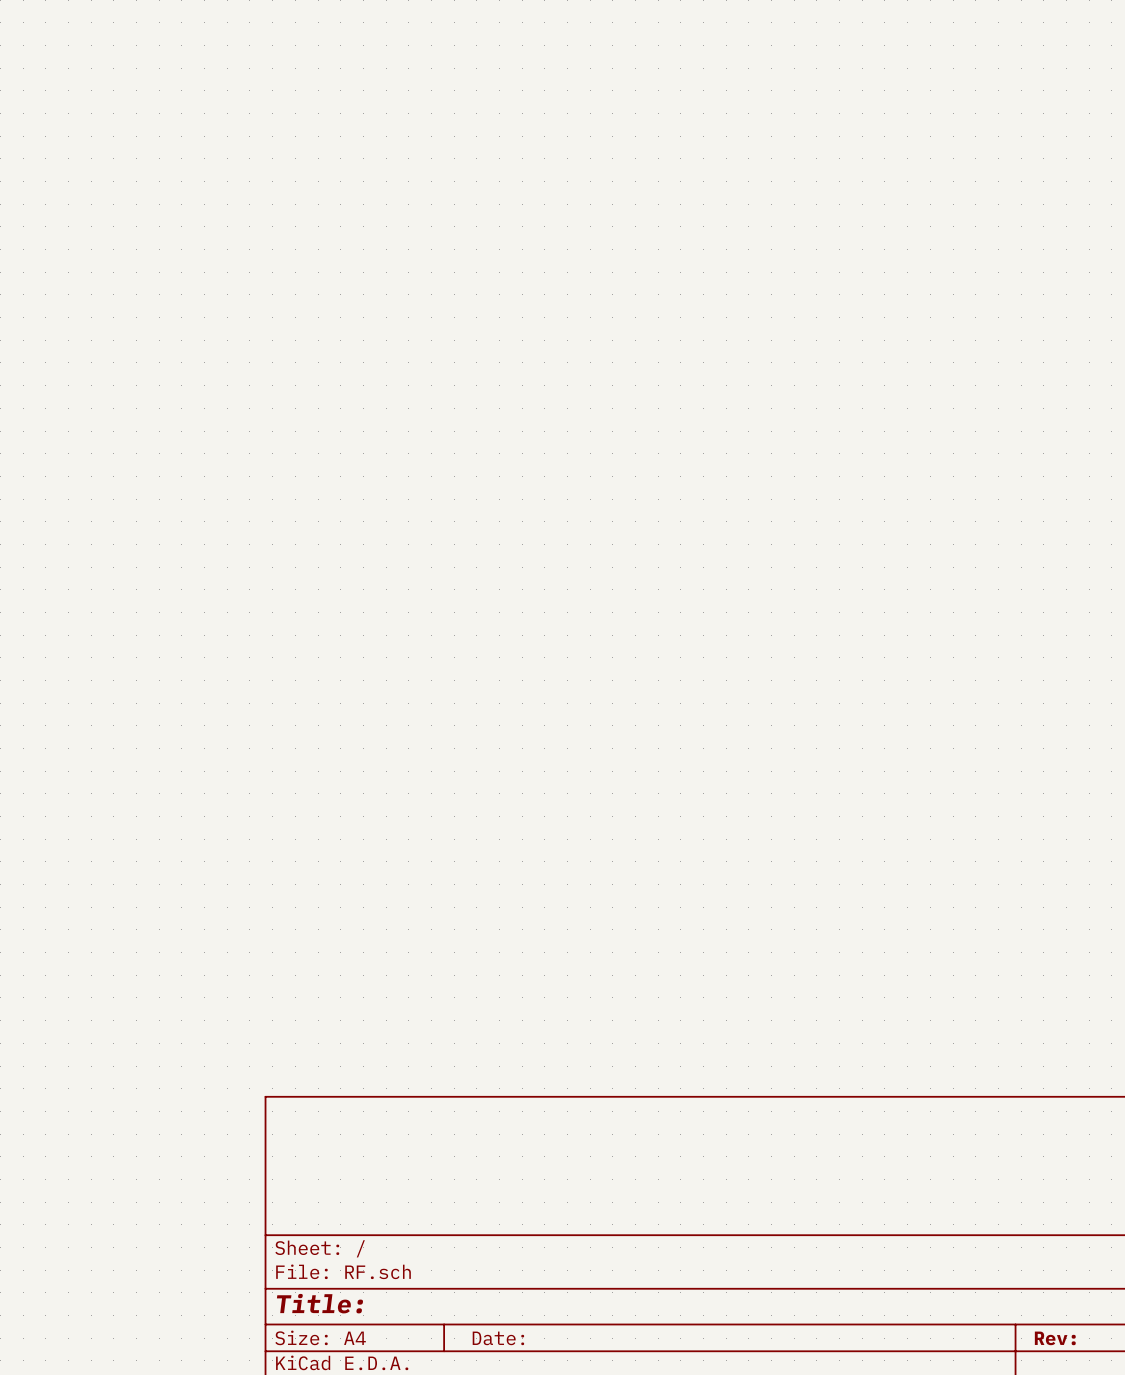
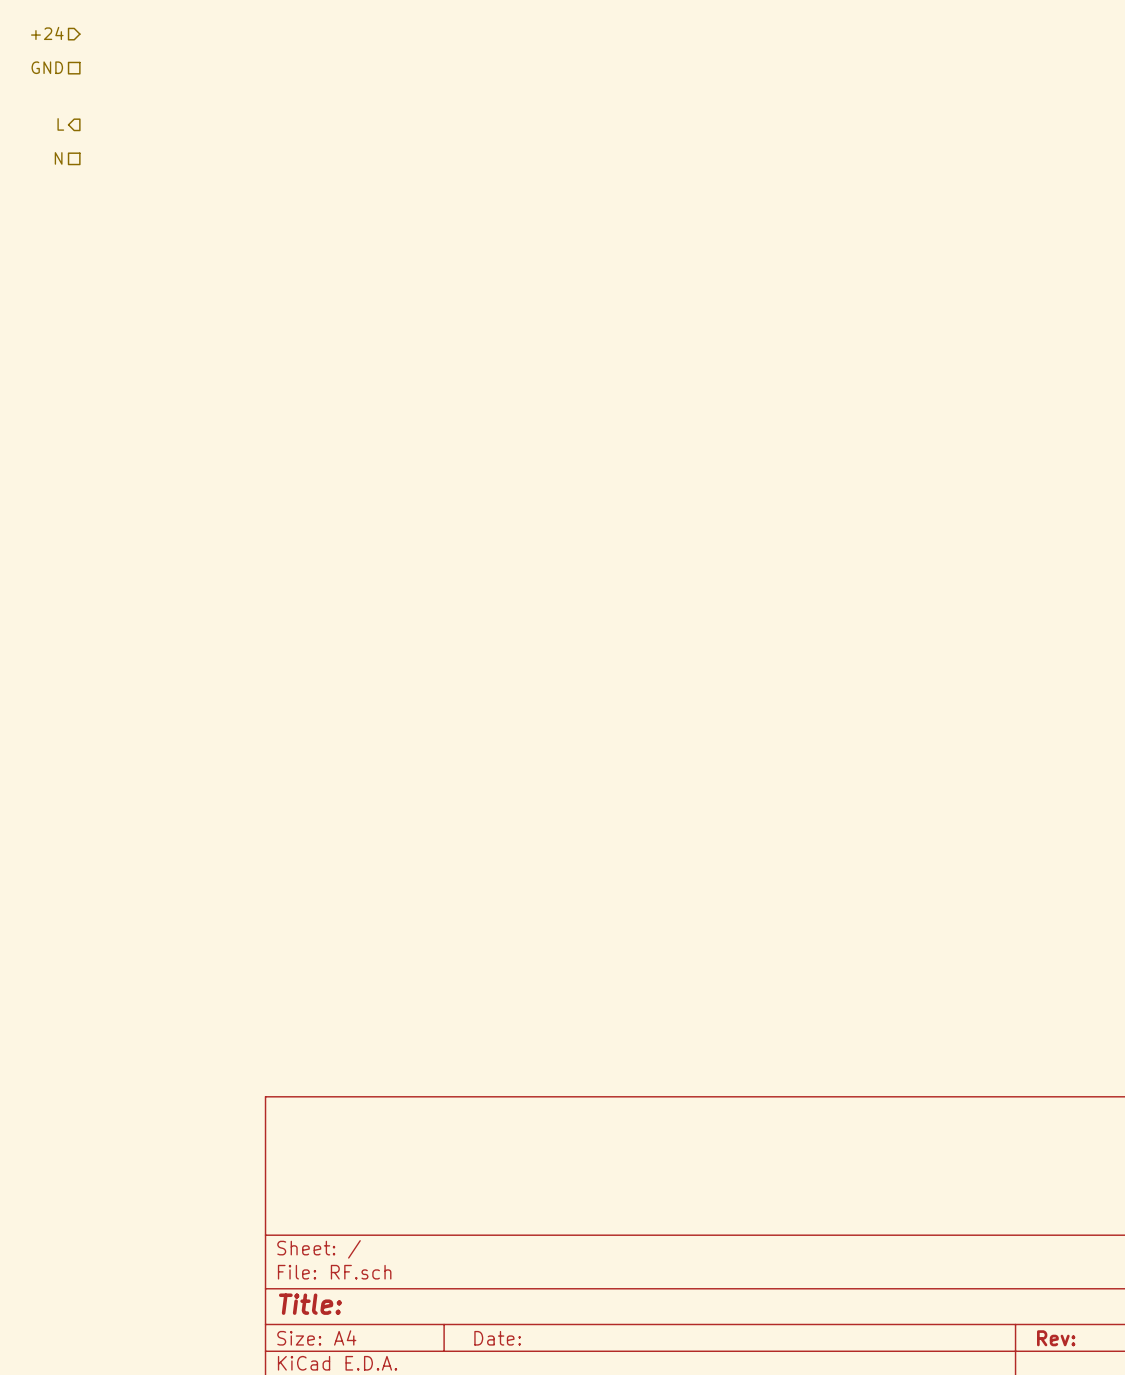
hierarchical label: none -> +24 (47, 33)
hierarchical label: none -> GND (47, 67)
hierarchical label: none -> L (60, 124)
hierarchical label: none -> N (58, 158)

